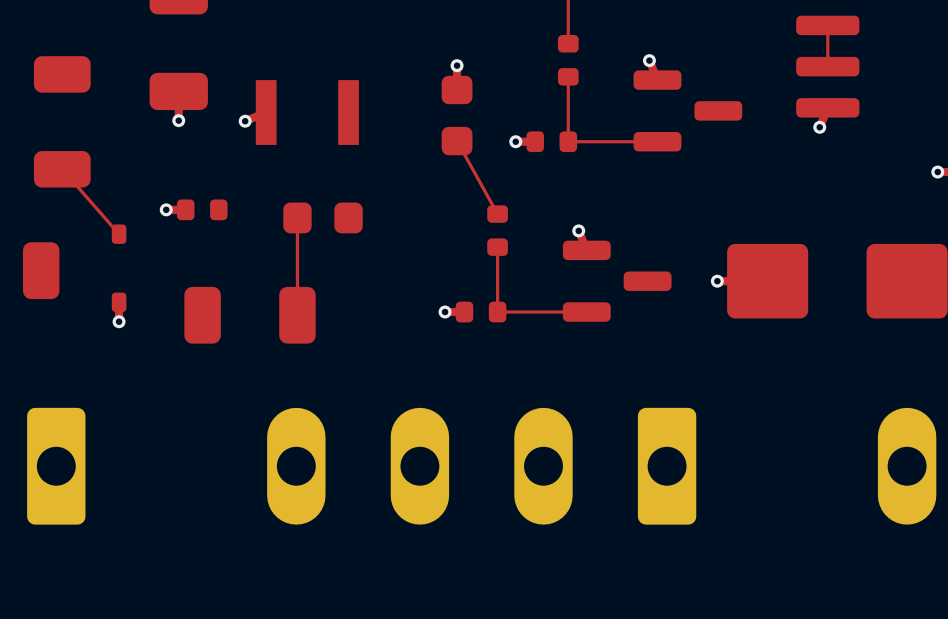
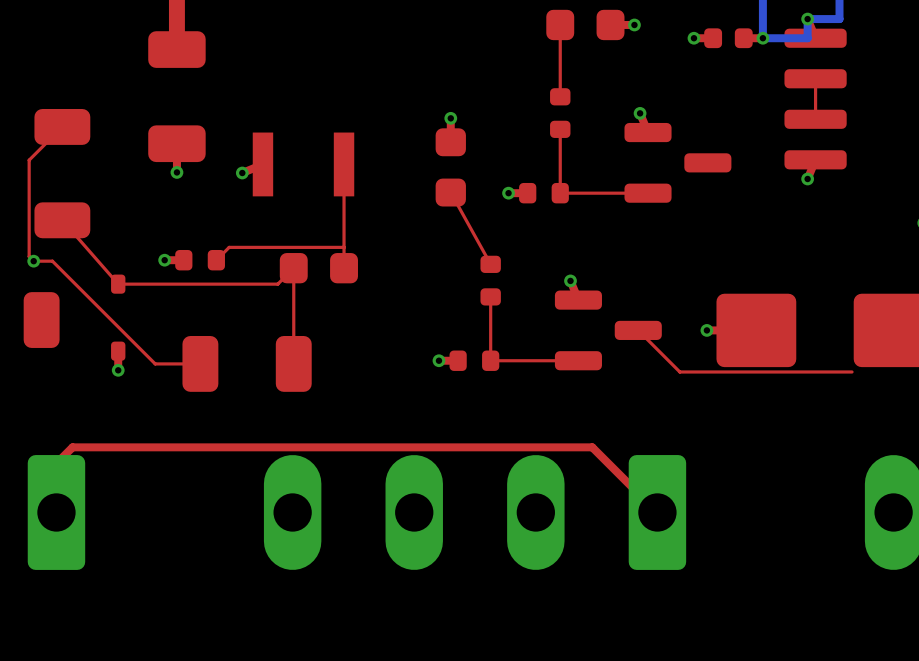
top track: none -> (62, 126) (29, 160) (29, 256) (33, 261) (52, 261) (155, 363) (200, 363)
top track: none -> (344, 164) (344, 268)
top track: none -> (344, 247) (229, 247) (216, 260)
via: none -> (33, 261)
top track: none -> (293, 268) (277, 284) (118, 284)
top track: none -> (638, 330) (679, 371) (852, 371)
top track: none -> (657, 512) (592, 447) (72, 447) (56, 463) (56, 512)

